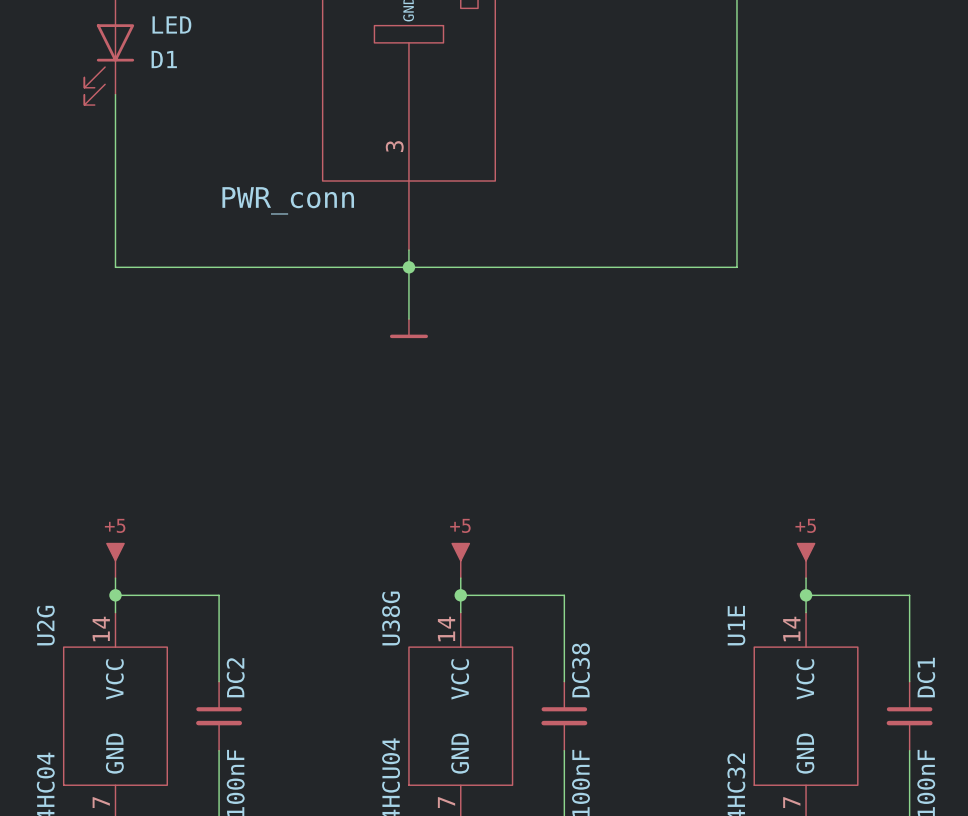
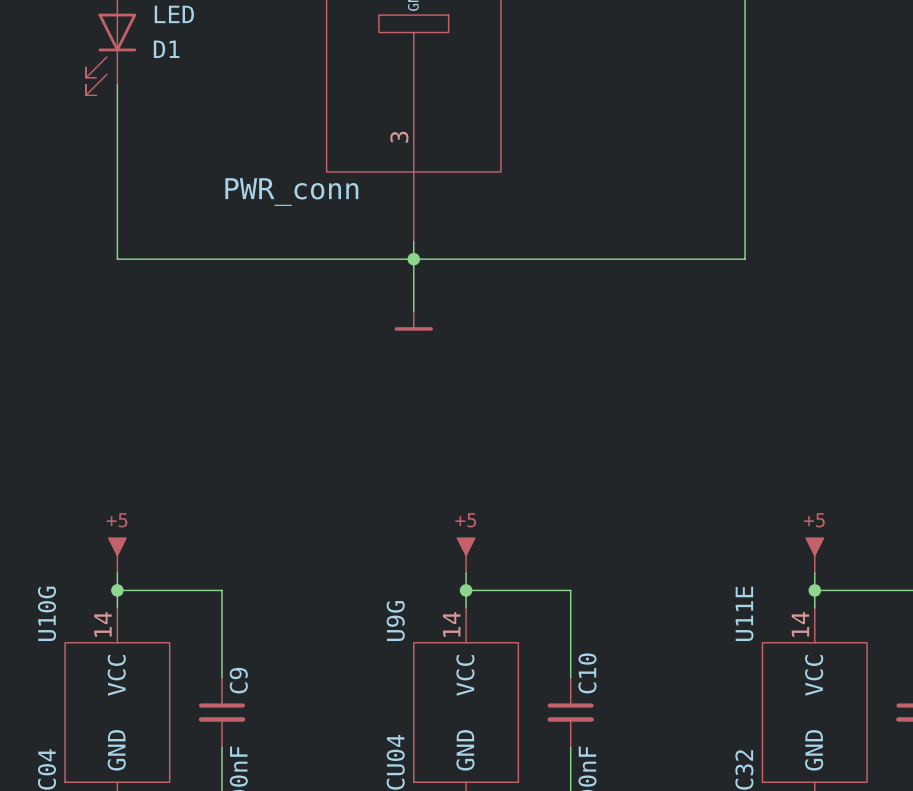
U38G name: U38G (391, 618) -> U9G (395, 621)
U2G name: U2G (45, 625) -> U10G (46, 613)
U1E name: U1E (736, 625) -> U11E (744, 613)
DC38 name: DC38 (580, 670) -> C10 (587, 673)
DC2 name: DC2 (235, 677) -> C9 (238, 680)

